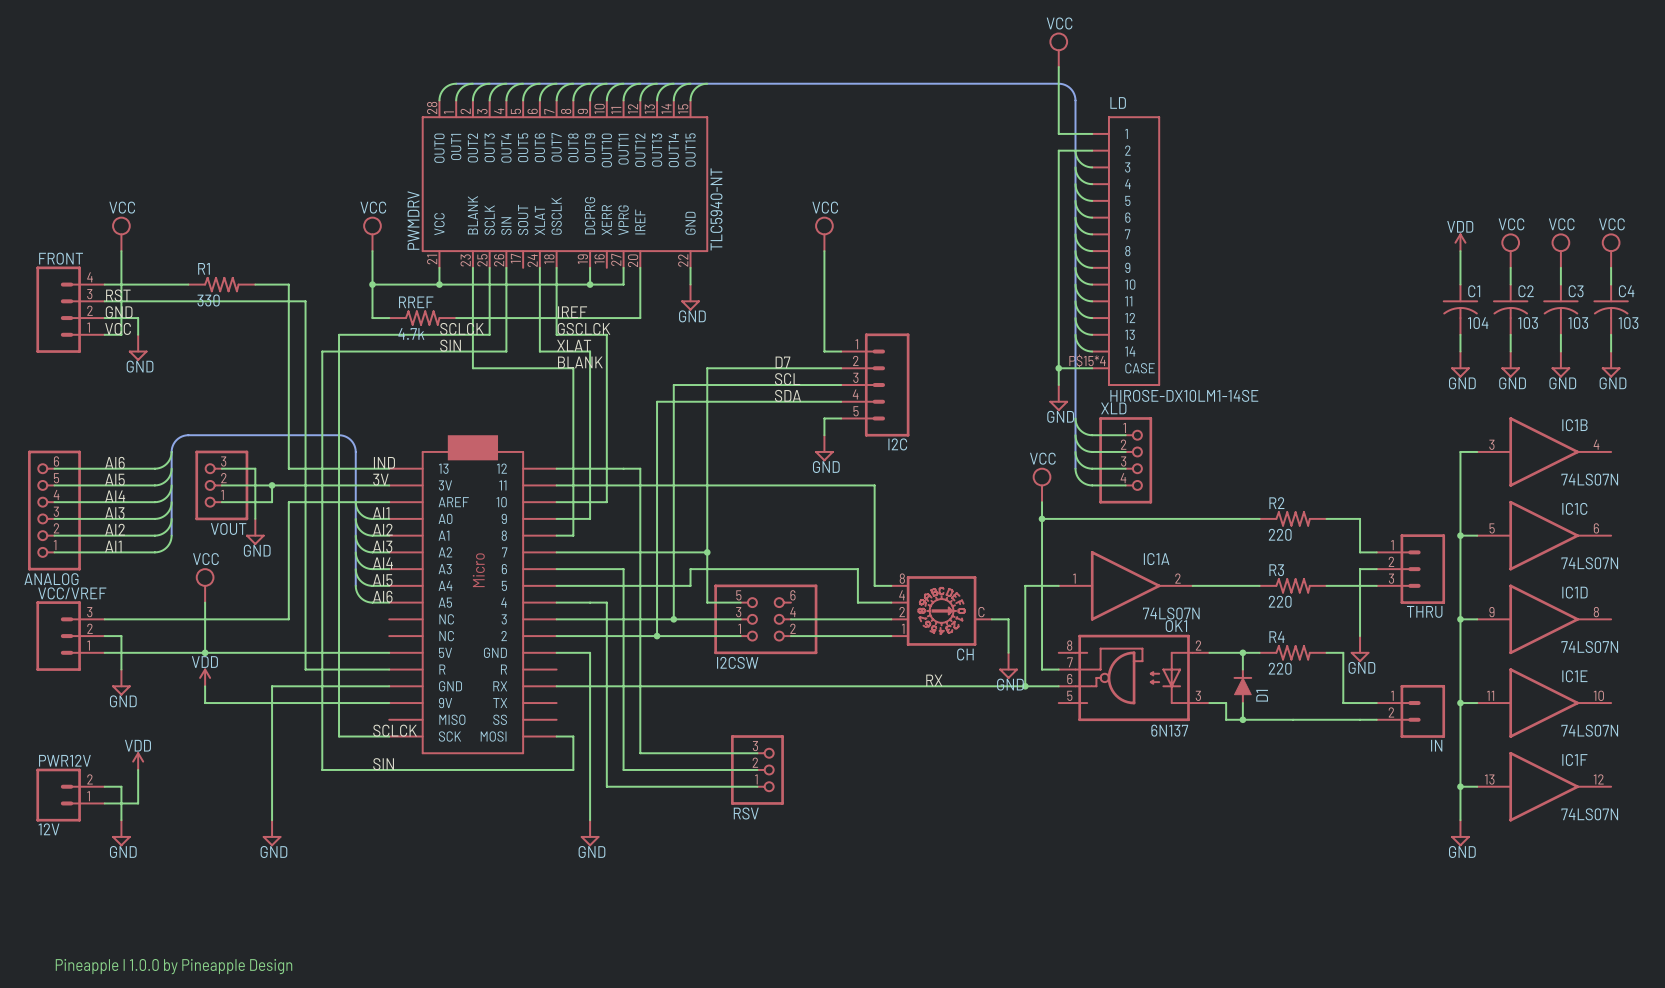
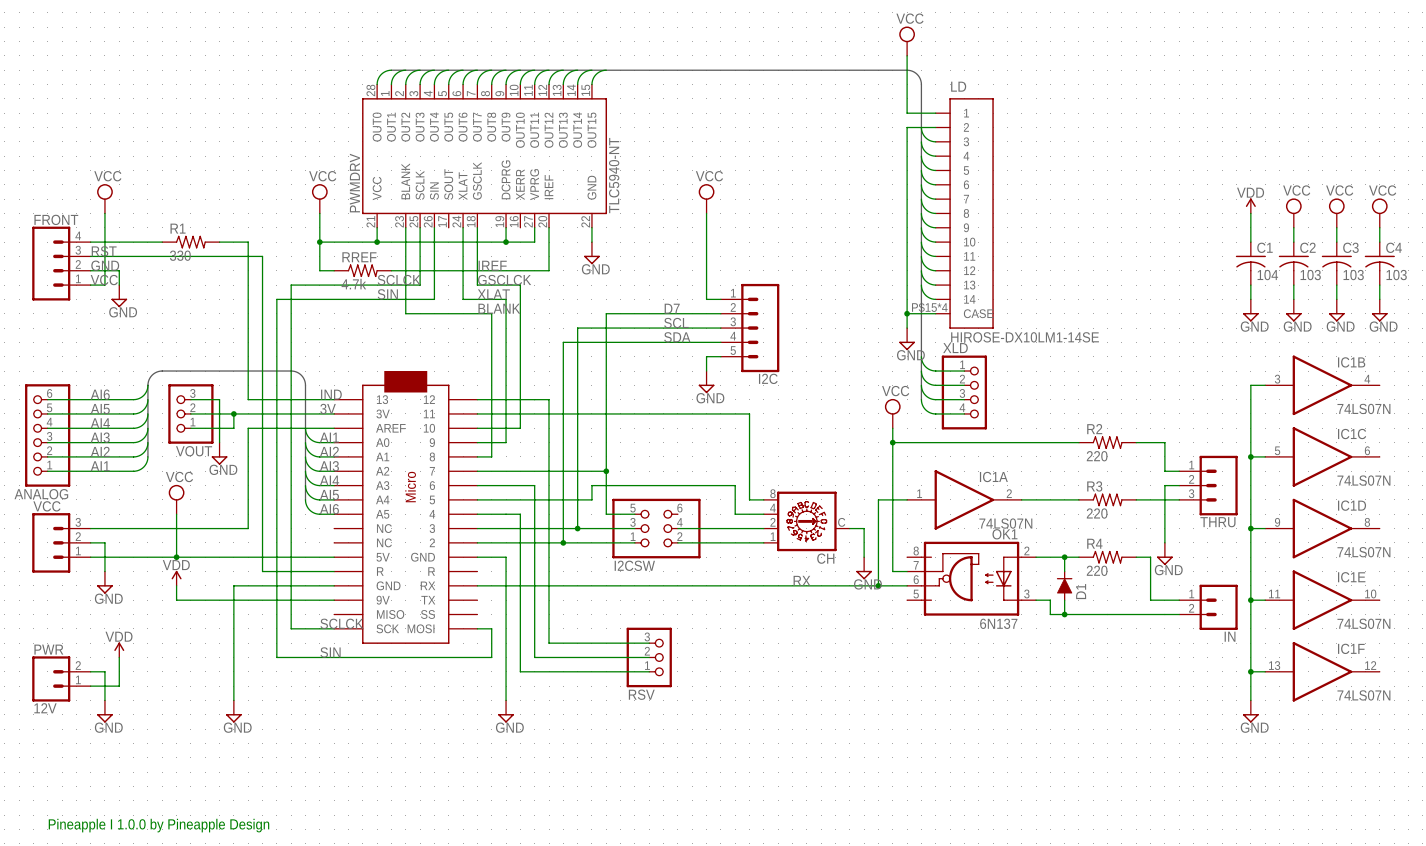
VCC/VREF name: VCC/VREF (72, 593) -> VCC (46, 506)
PWR12V name: PWR12V (64, 760) -> PWR (48, 649)

